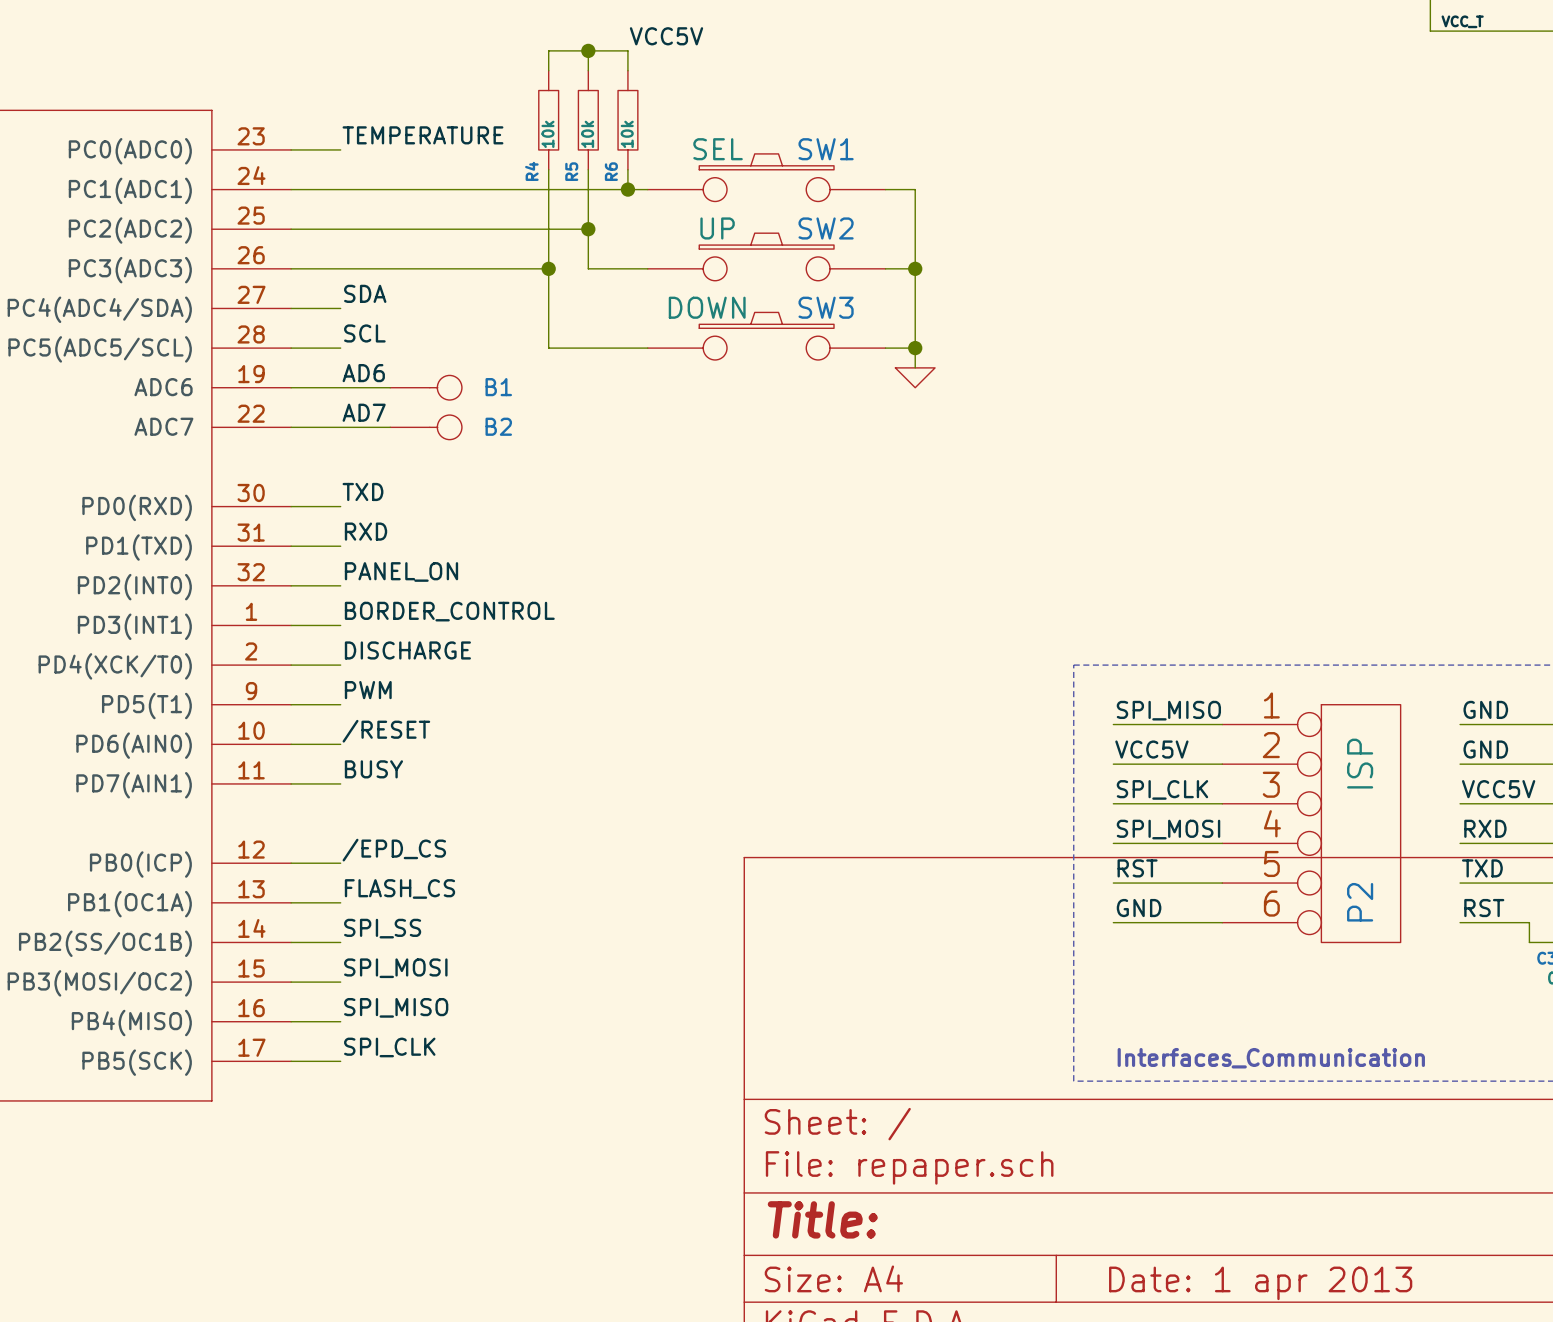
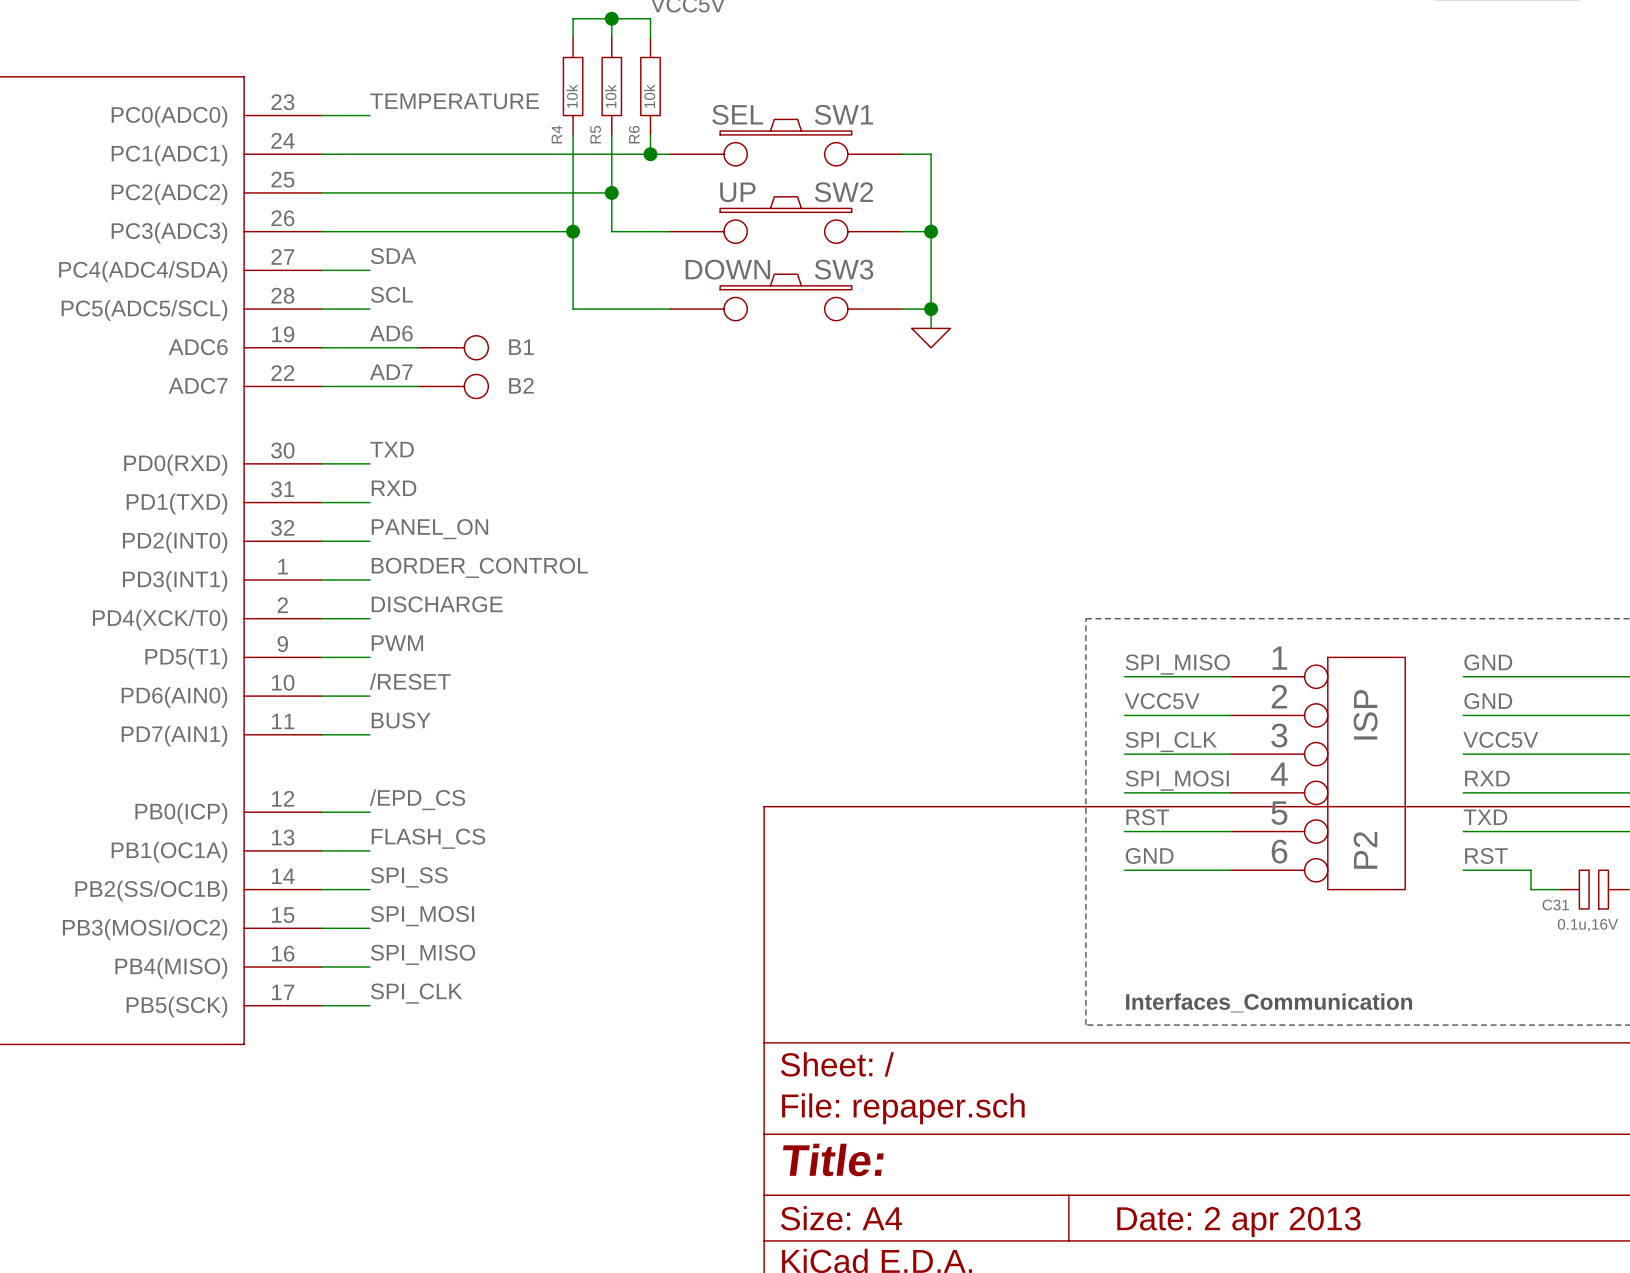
title block: Date: 1 apr 2013 (1260, 1283) -> Date: 2 apr 2013 (1238, 1222)

